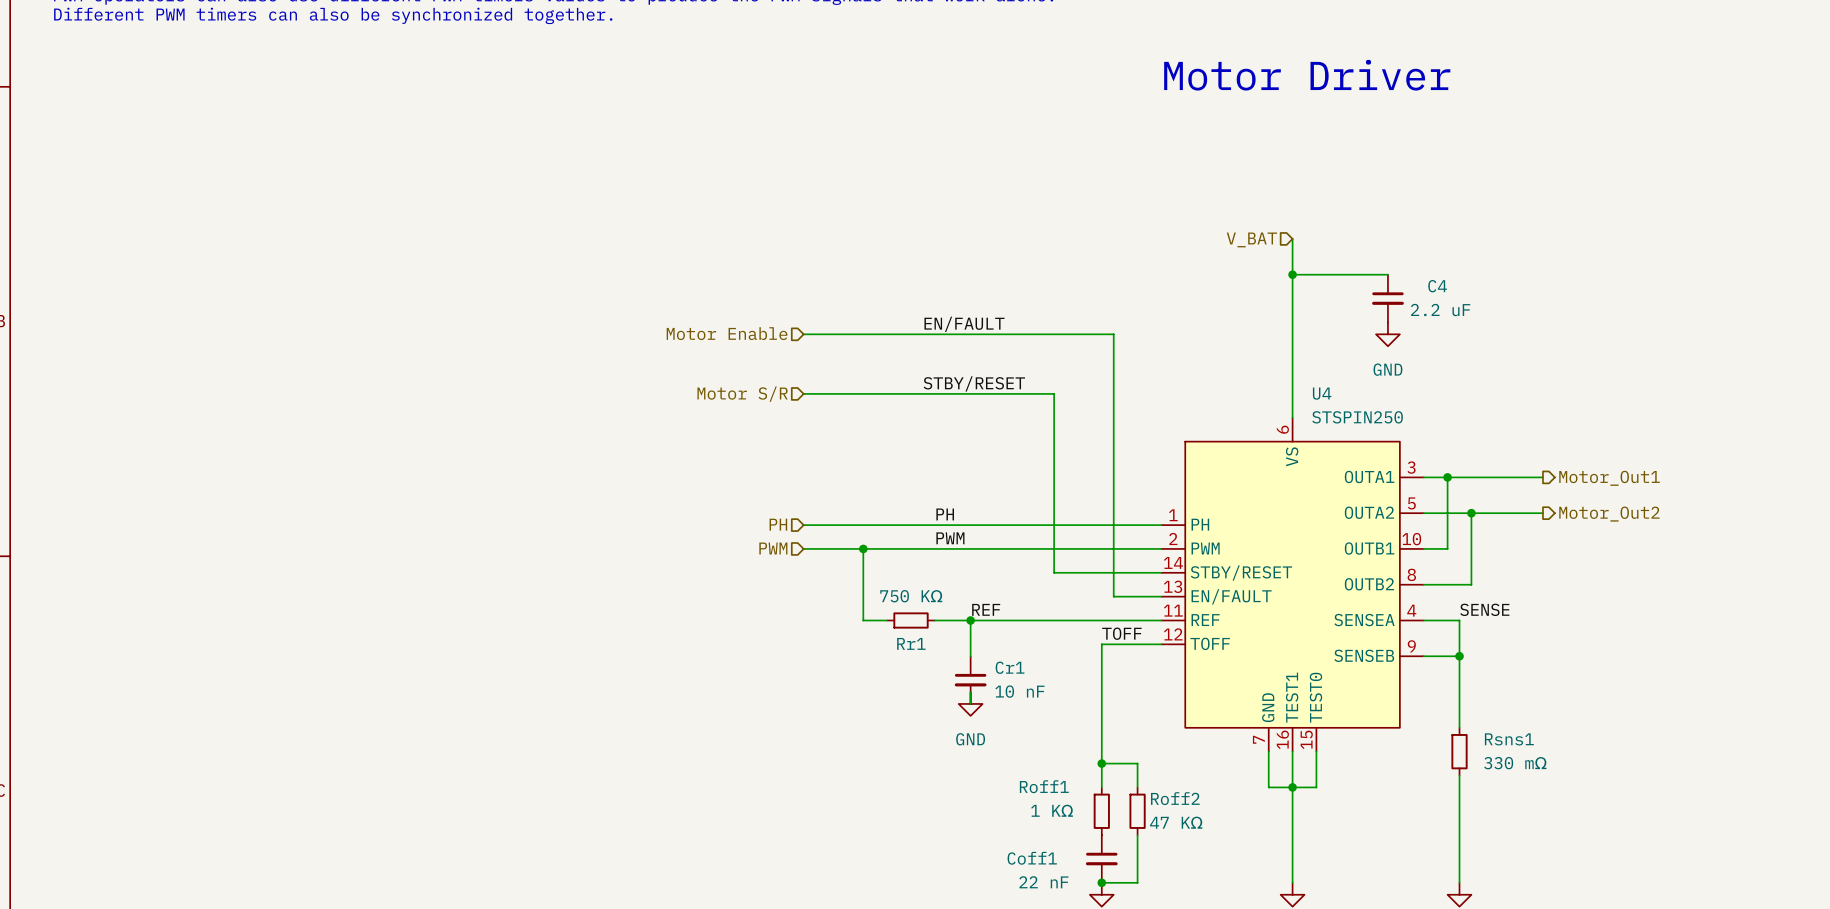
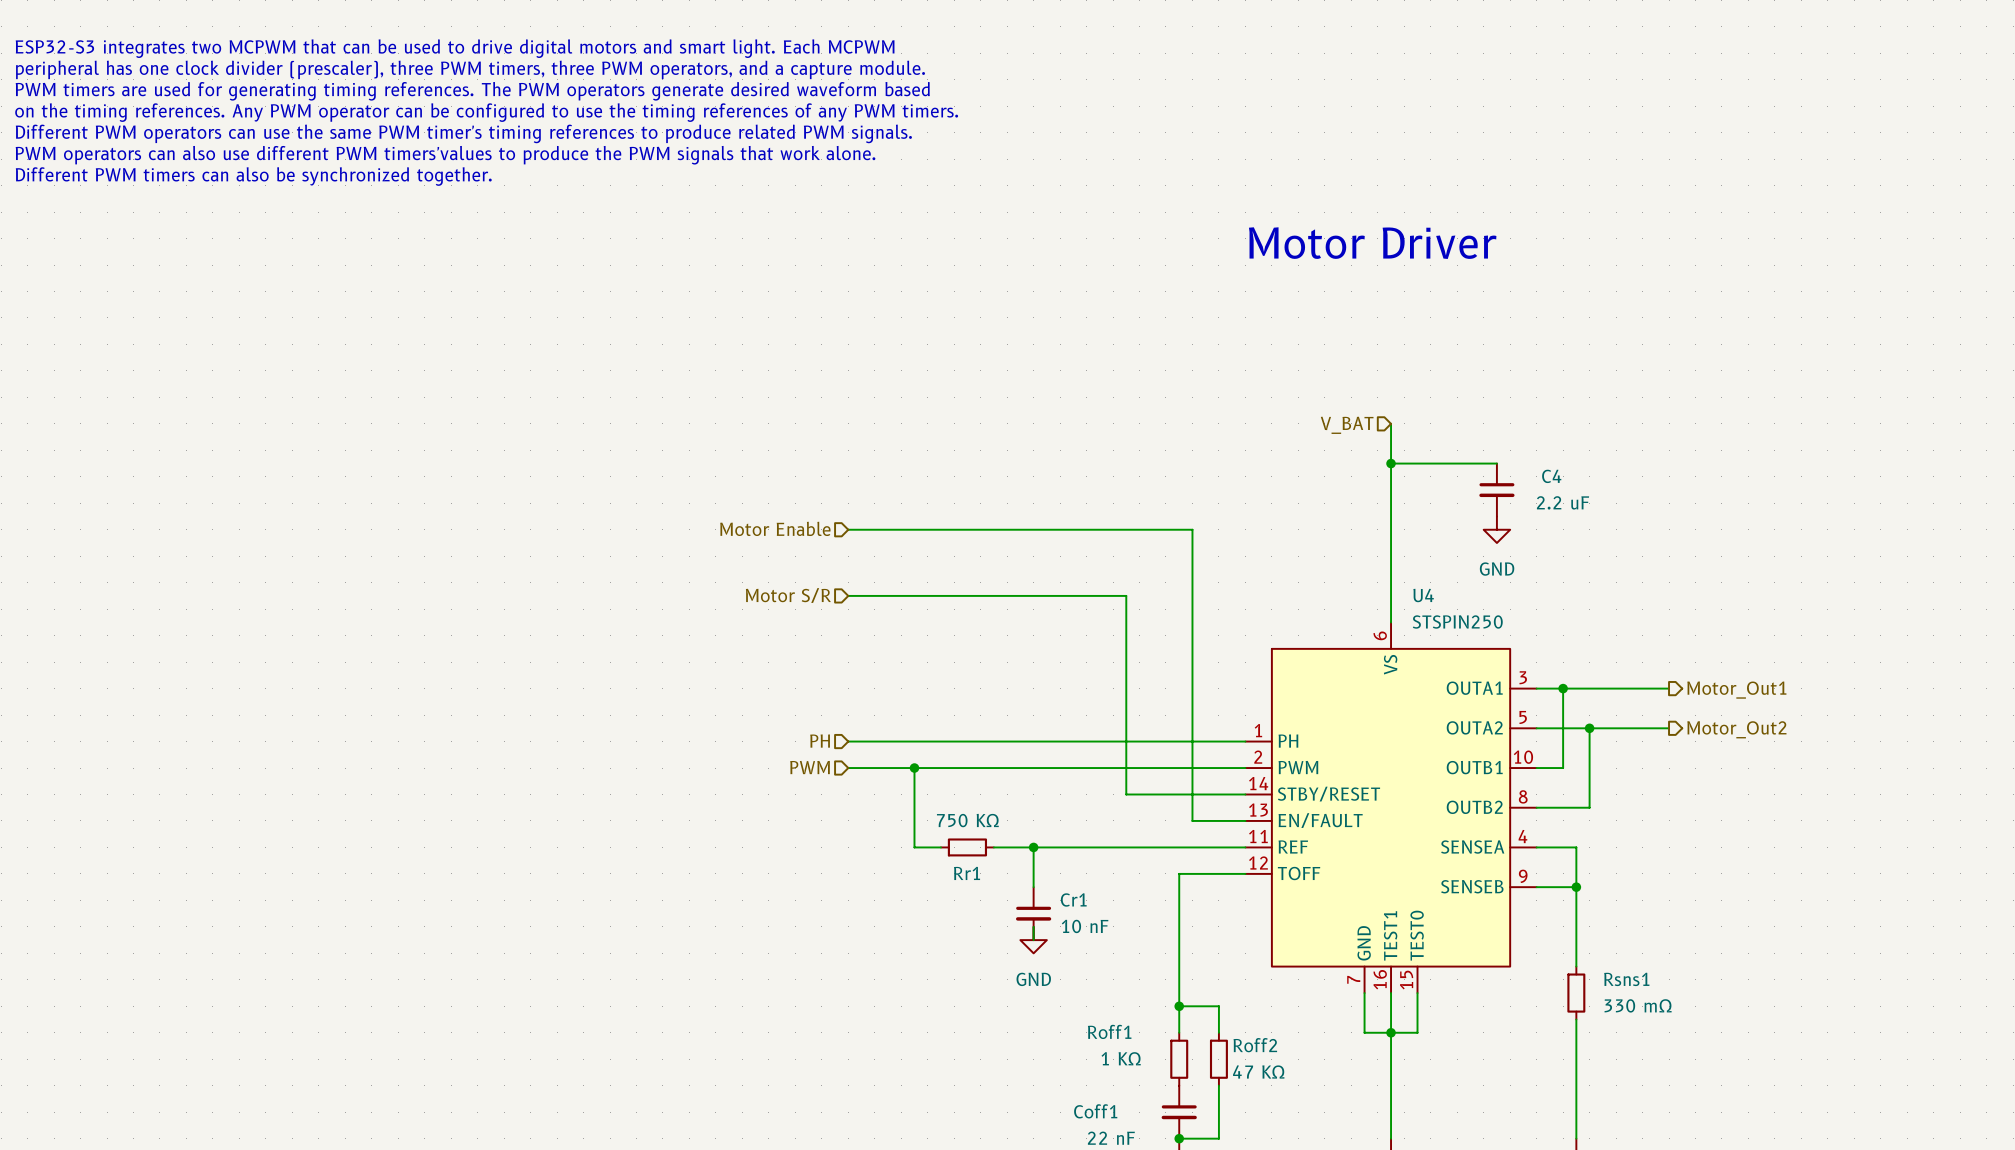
label: EN/FAULT (964, 324) -> none
label: STBY/RESET (974, 383) -> none
label: PH (945, 514) -> none
label: PWM (950, 538) -> none
label: REF (986, 609) -> none
label: SENSE (1484, 609) -> none
label: TOFF (1121, 633) -> none

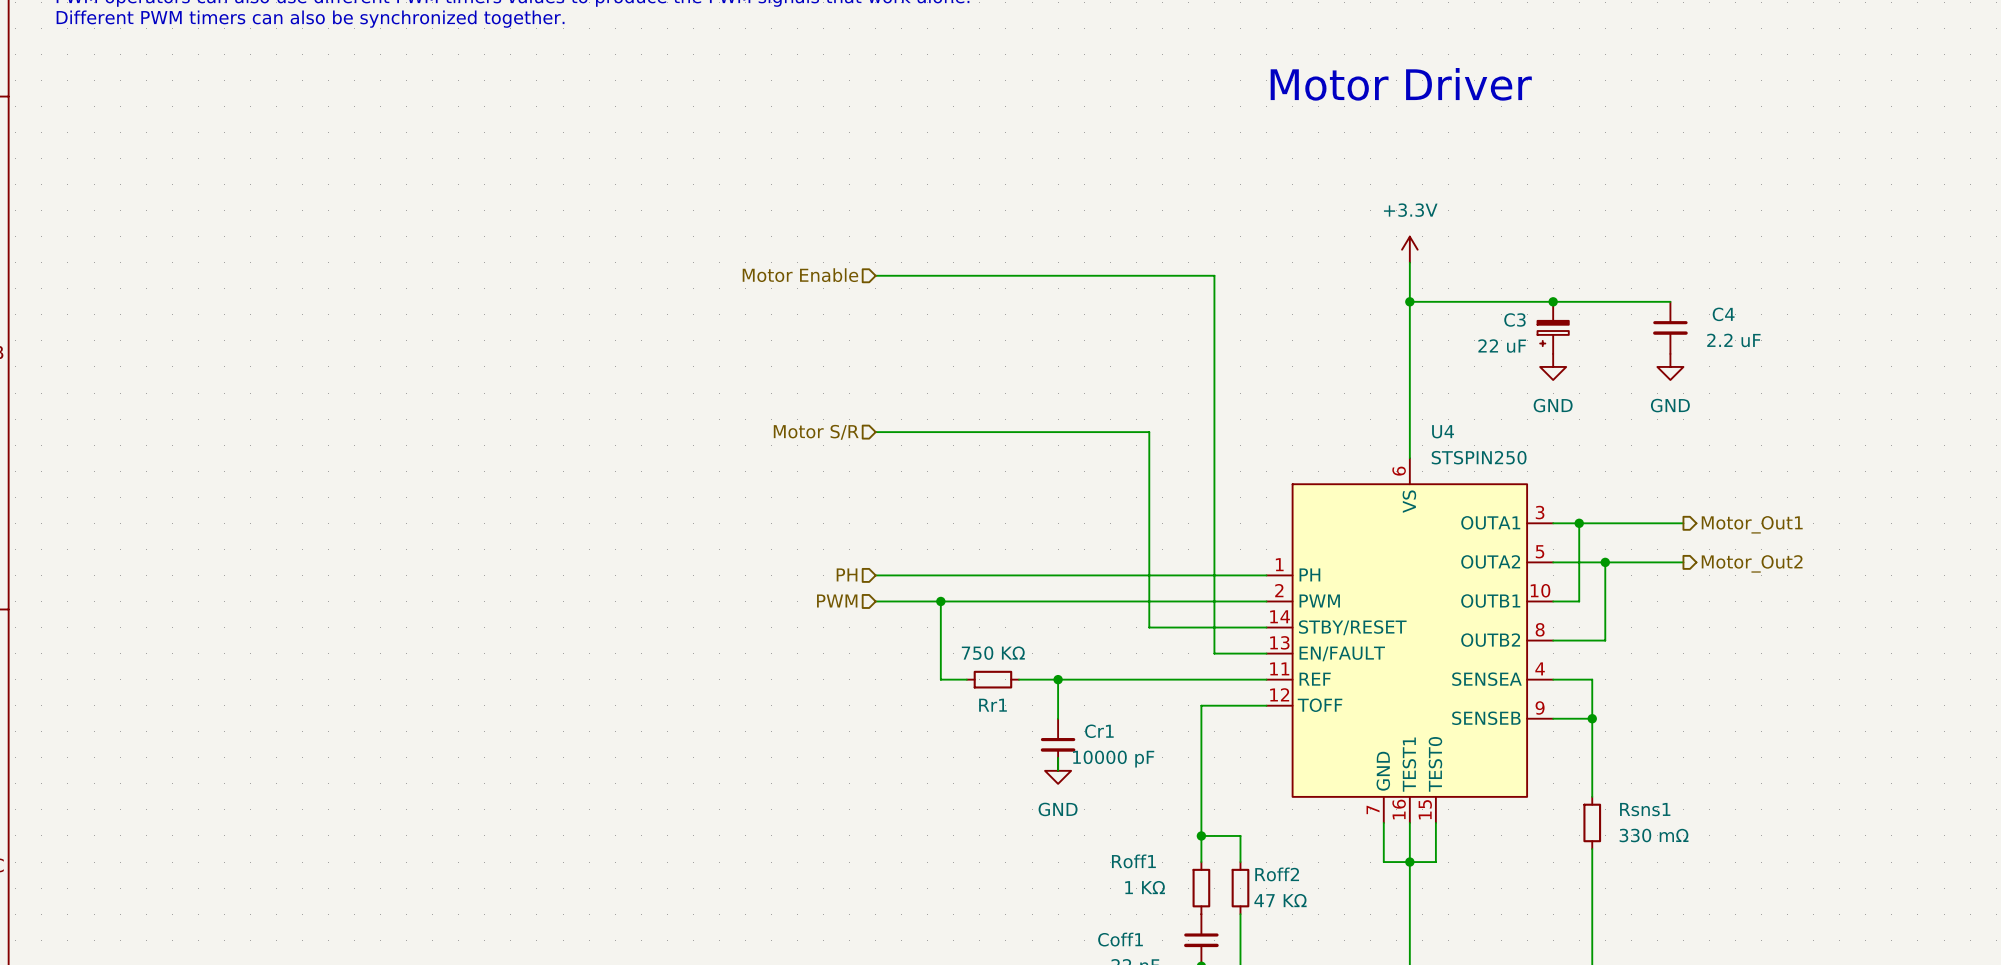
power symbol: none -> +3.3V (1409, 249)
hierarchical label: V_BAT (1347, 425) -> none
wire: none -> (1514, 301) (1670, 301)
junction: none -> (1553, 301)
C4 position: (1496, 490) -> (1670, 327)
C3: none -> 22 uF (1553, 327)
hierarchical label position: Motor Enable (775, 528) -> Motor Enable (800, 275)
wire: (848, 529) (1192, 529) -> (875, 275) (1214, 275) (1214, 366)
power symbol position: GND (1496, 529) -> GND (1553, 366)
power symbol: none -> GND (1670, 366)
Cr1 value: 10 nF (1085, 926) -> 10000 pF (1113, 759)

